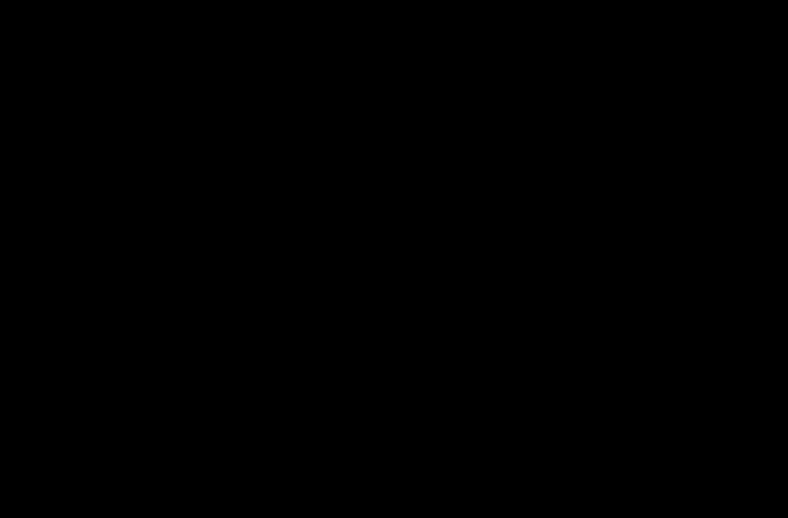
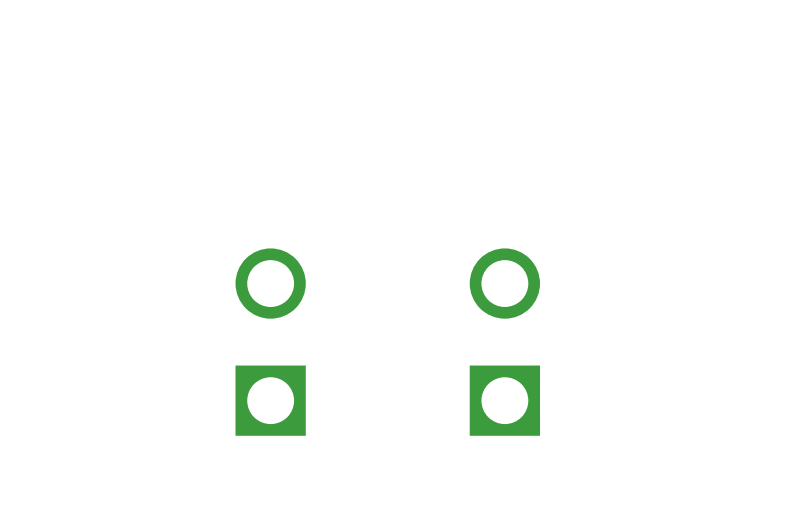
part: none -> (270, 342)
part: none -> (504, 342)

